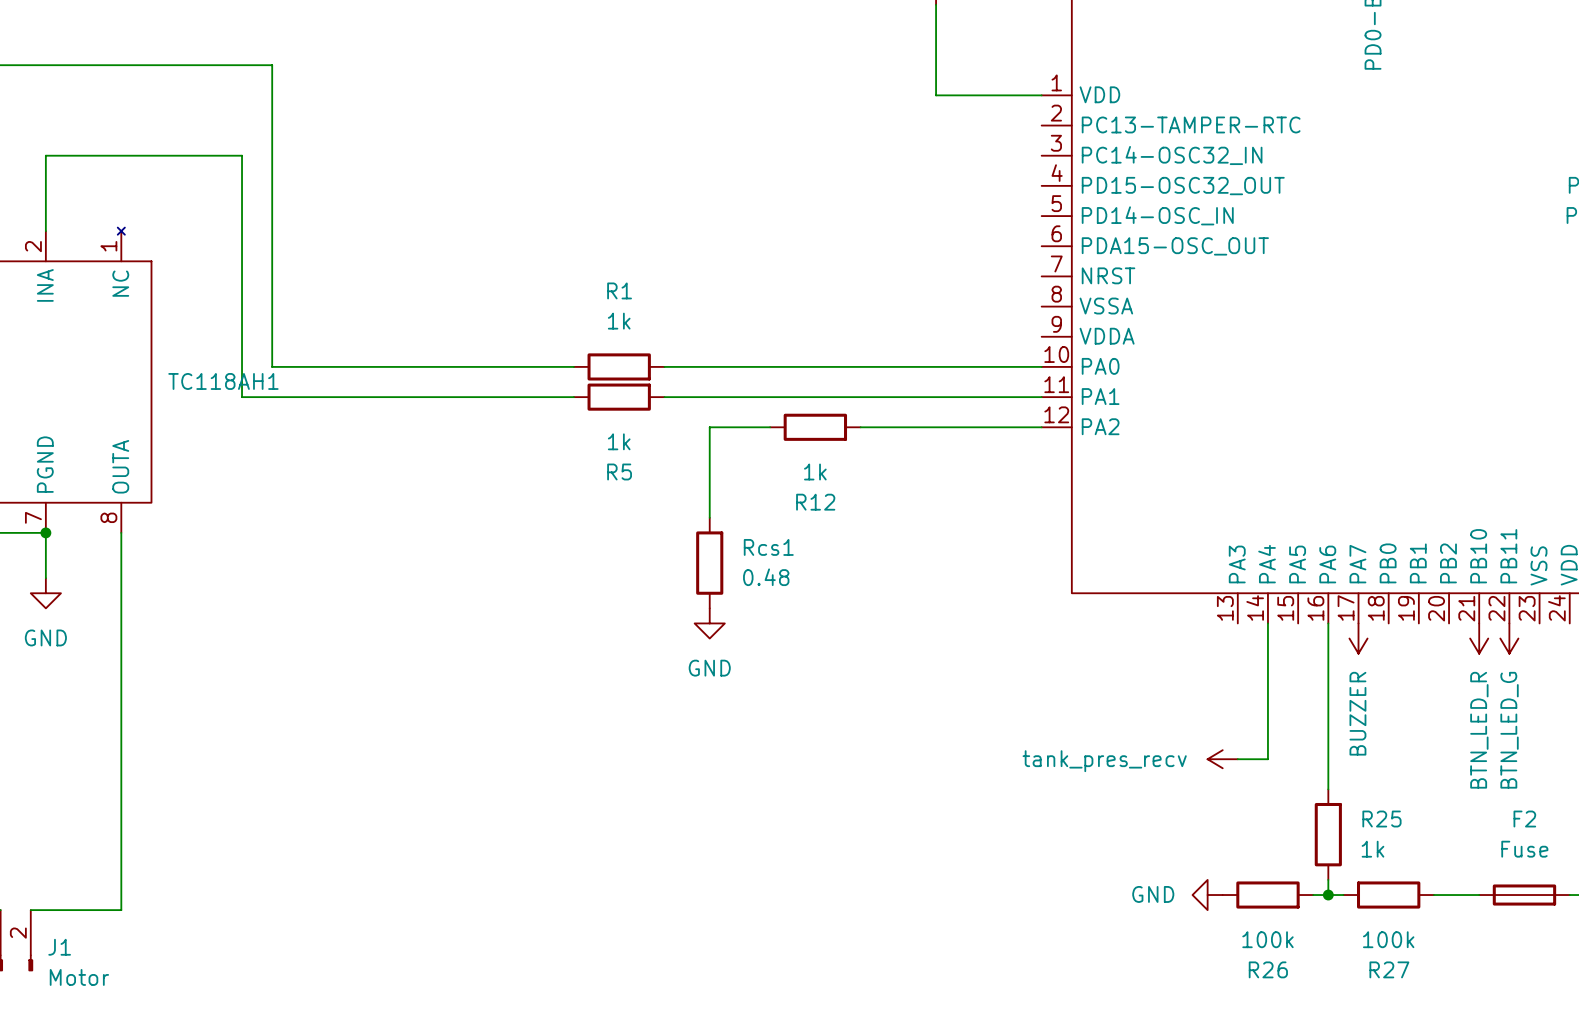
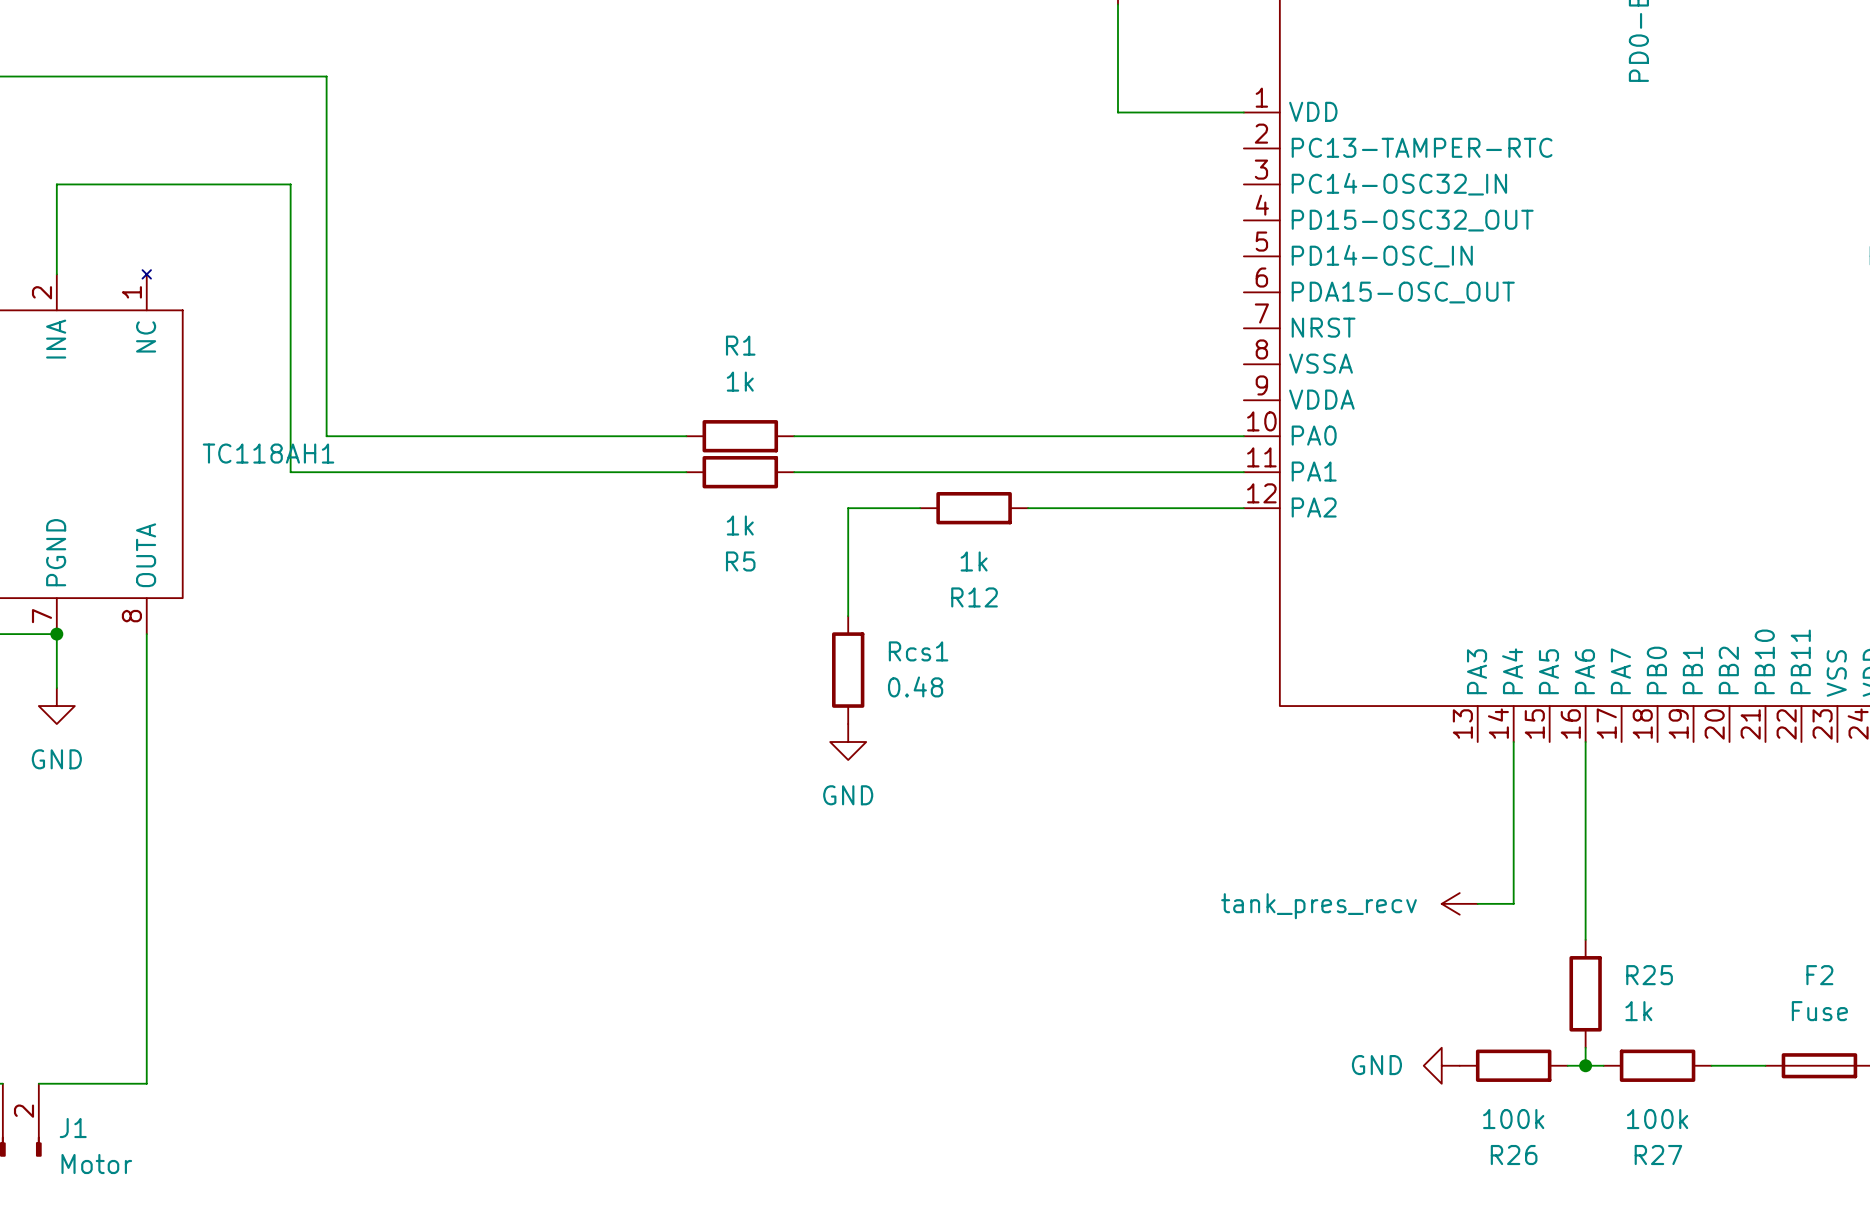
power symbol: BUZZER (1358, 638) -> none
power symbol: BTN_LED_R (1479, 638) -> none
power symbol: BTN_LED_G (1509, 638) -> none

